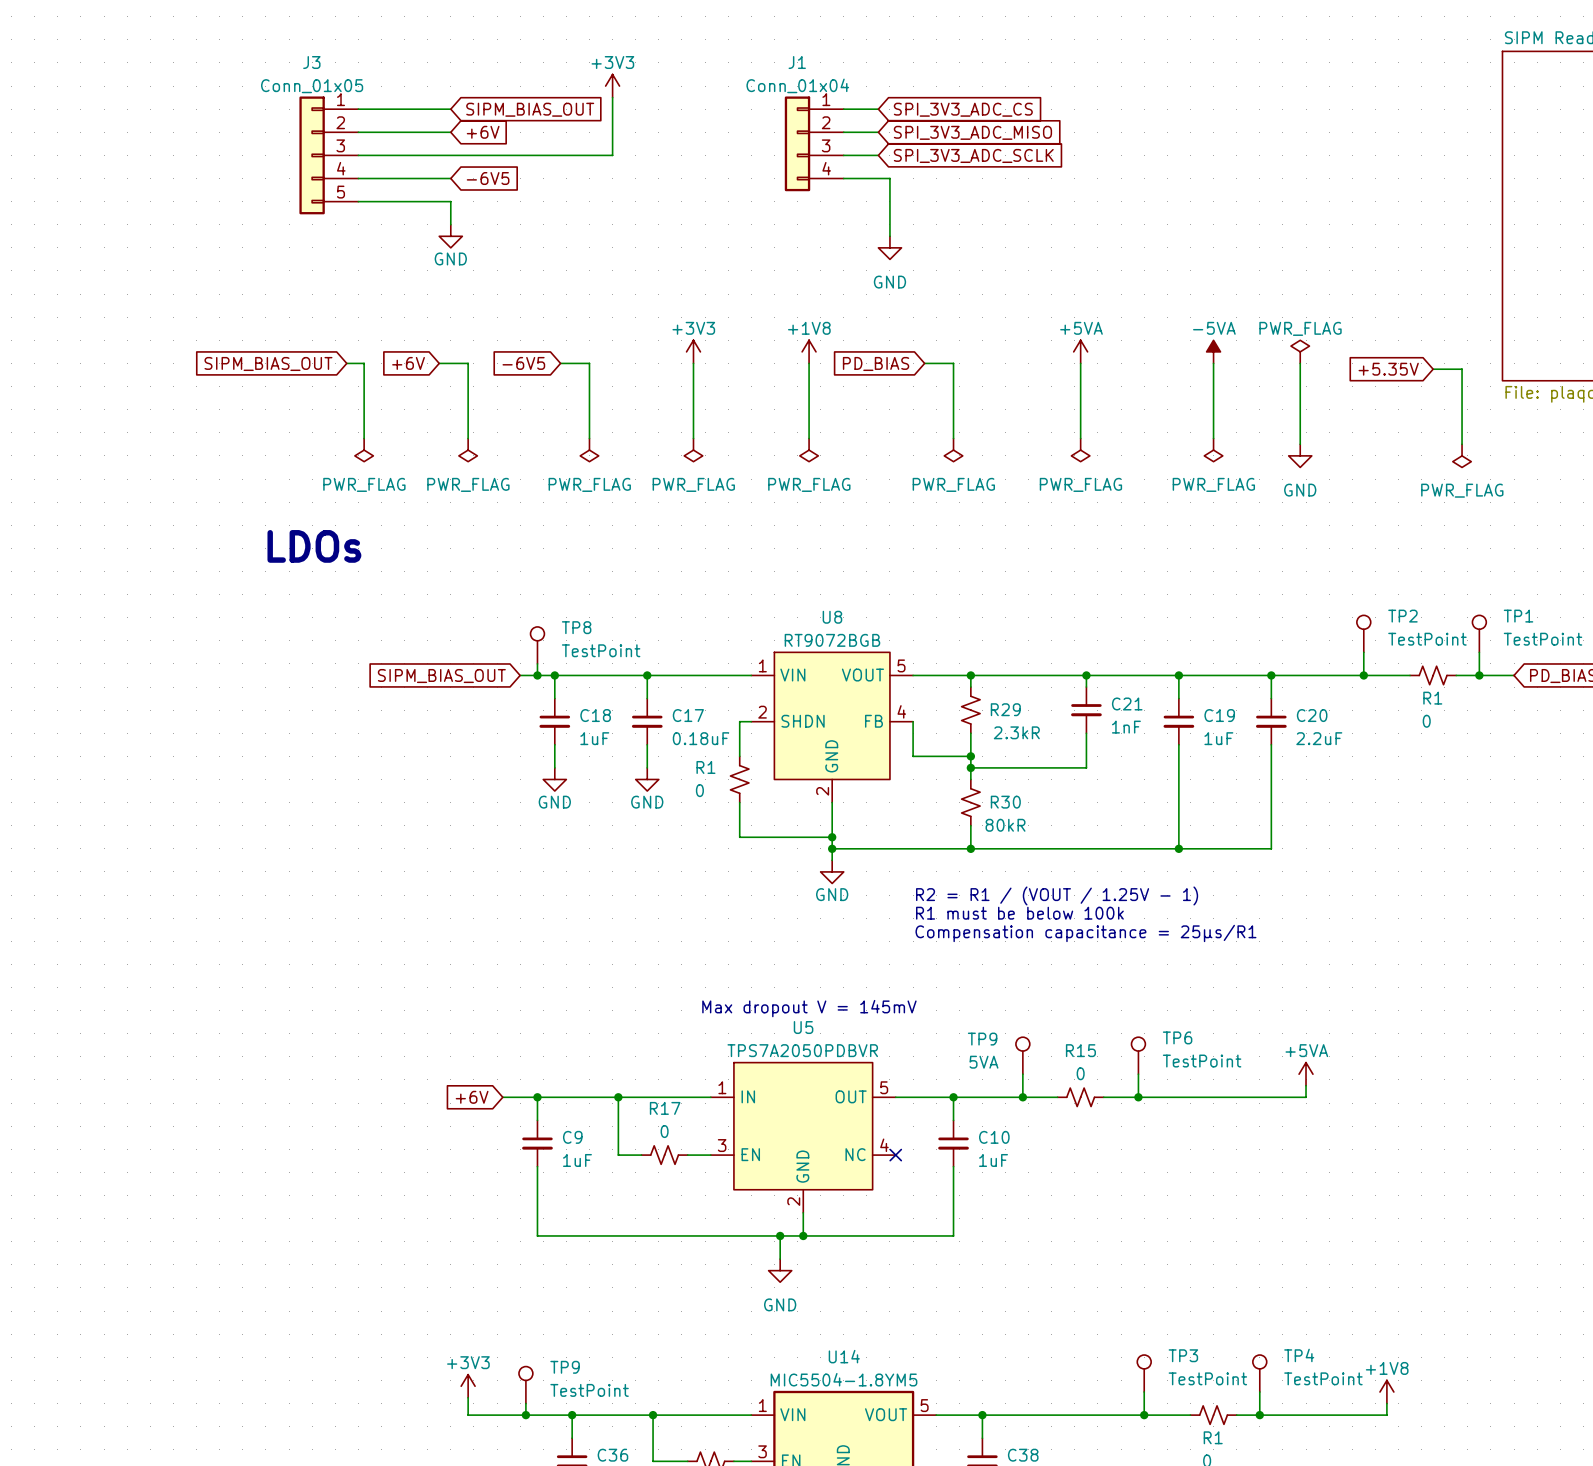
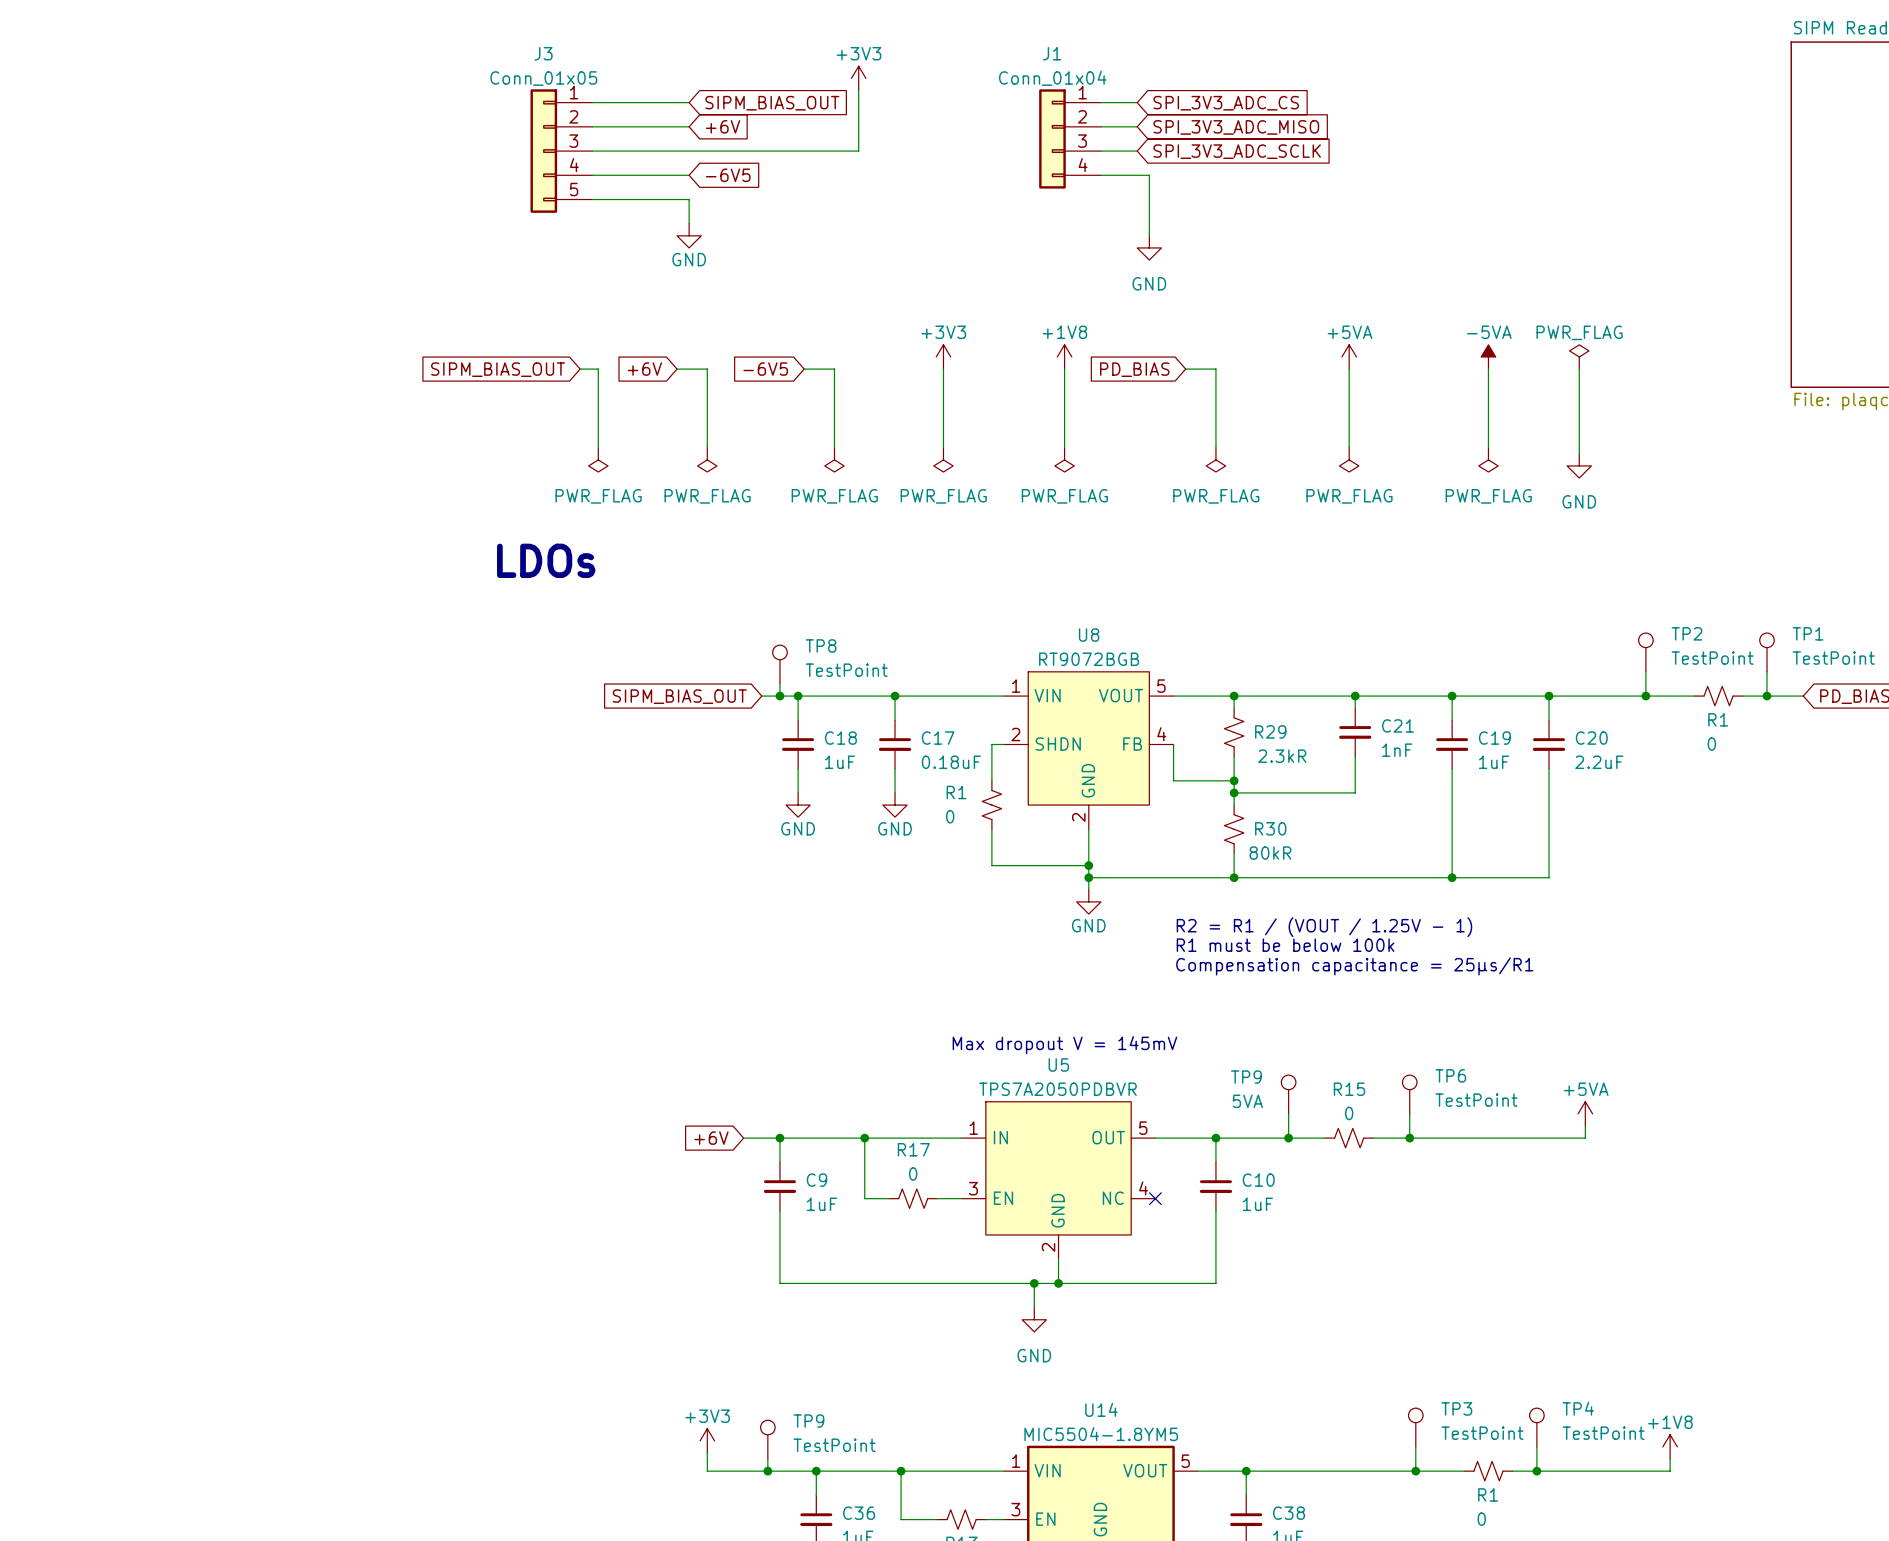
global label: +5.35V (1388, 369) -> none
wire: (1433, 369) (1462, 369) (1462, 444) -> none
power symbol: PWR_FLAG (1462, 455) -> none

